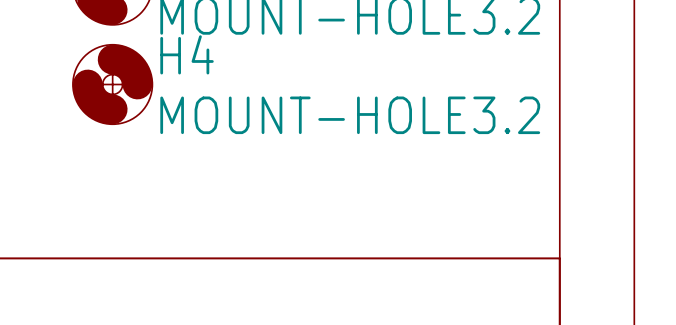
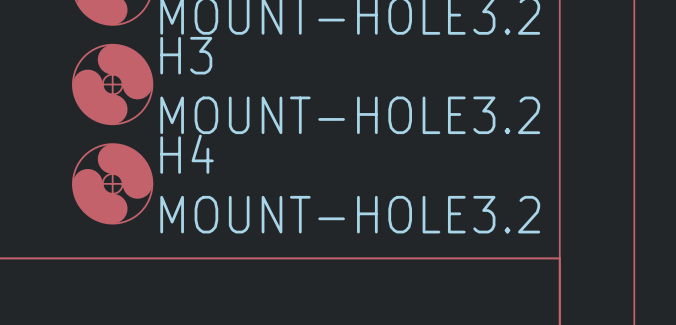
H4 name: H4 (187, 54) -> H3 (186, 55)
H4: none -> MOUNT-HOLE3.2 (112, 183)

